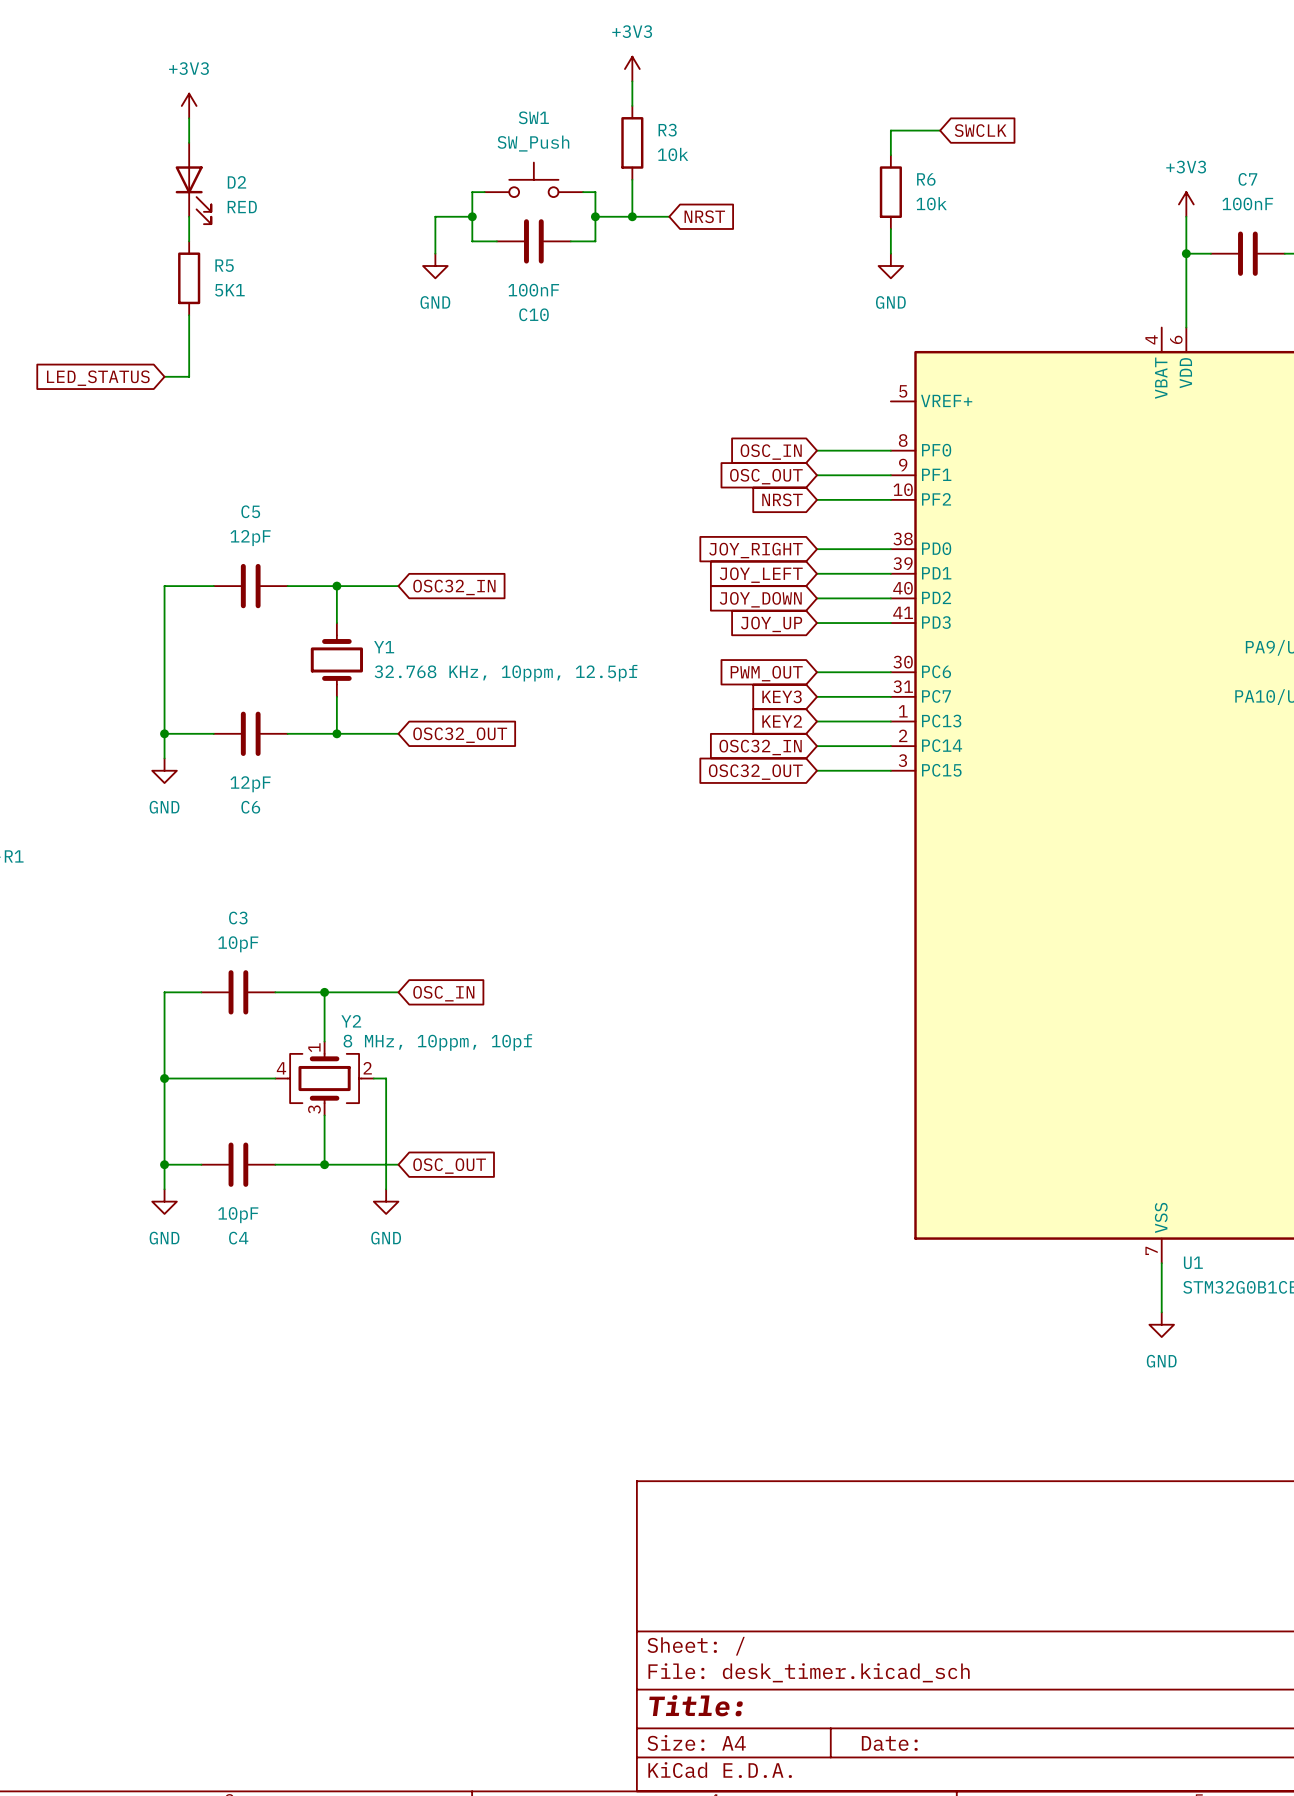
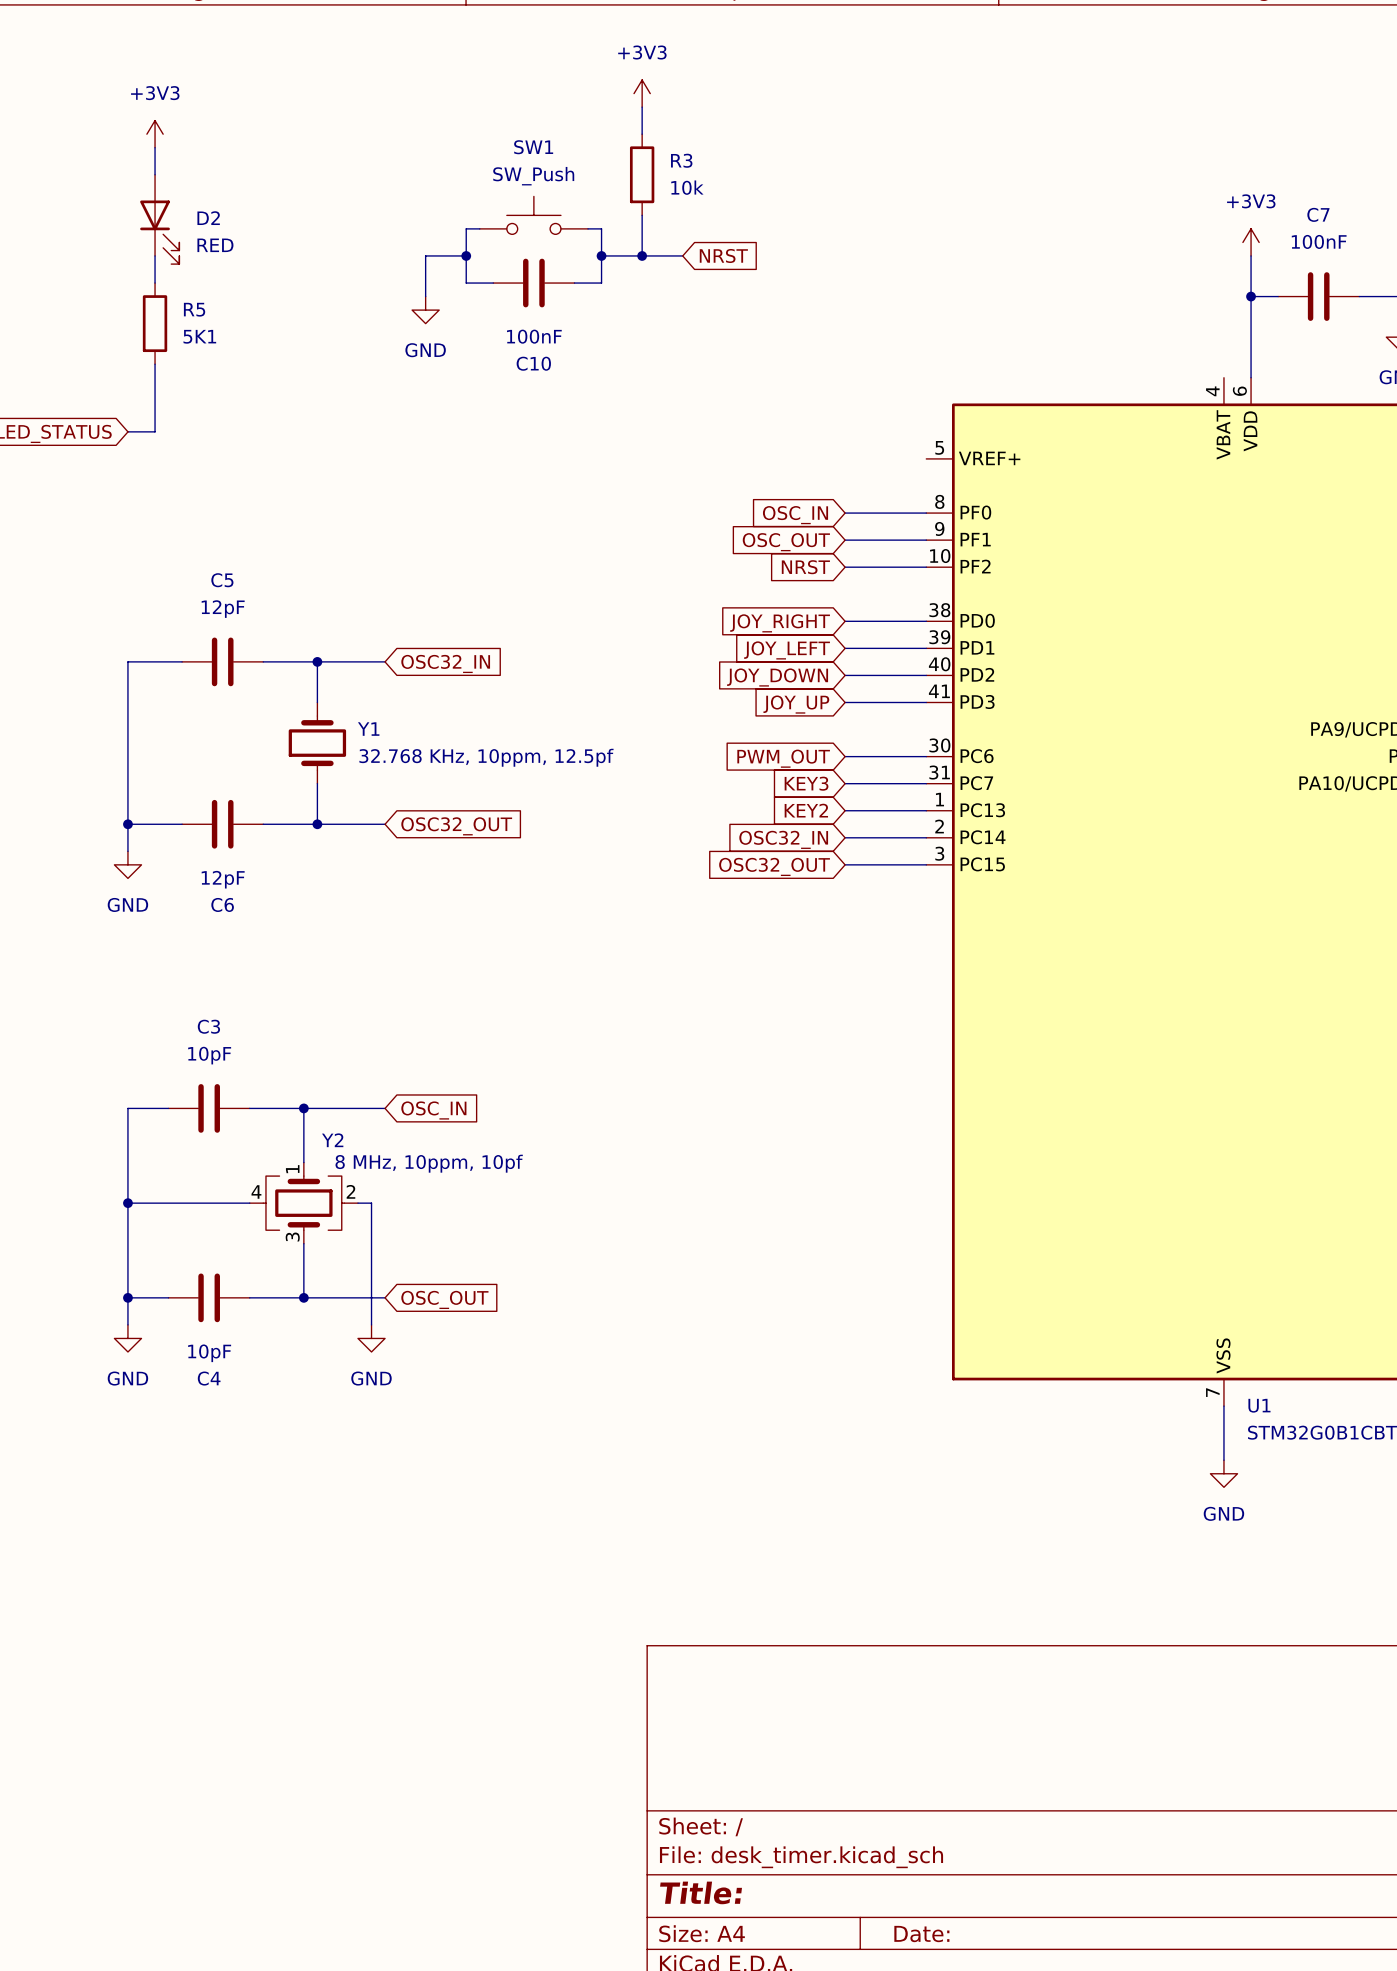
wire: (940, 130) (890, 130) (890, 155) -> none
global label: SWCLK (980, 130) -> none
R6: 10k (890, 192) -> none
wire: (890, 229) (890, 253) -> none
power symbol: GND (890, 266) -> none

